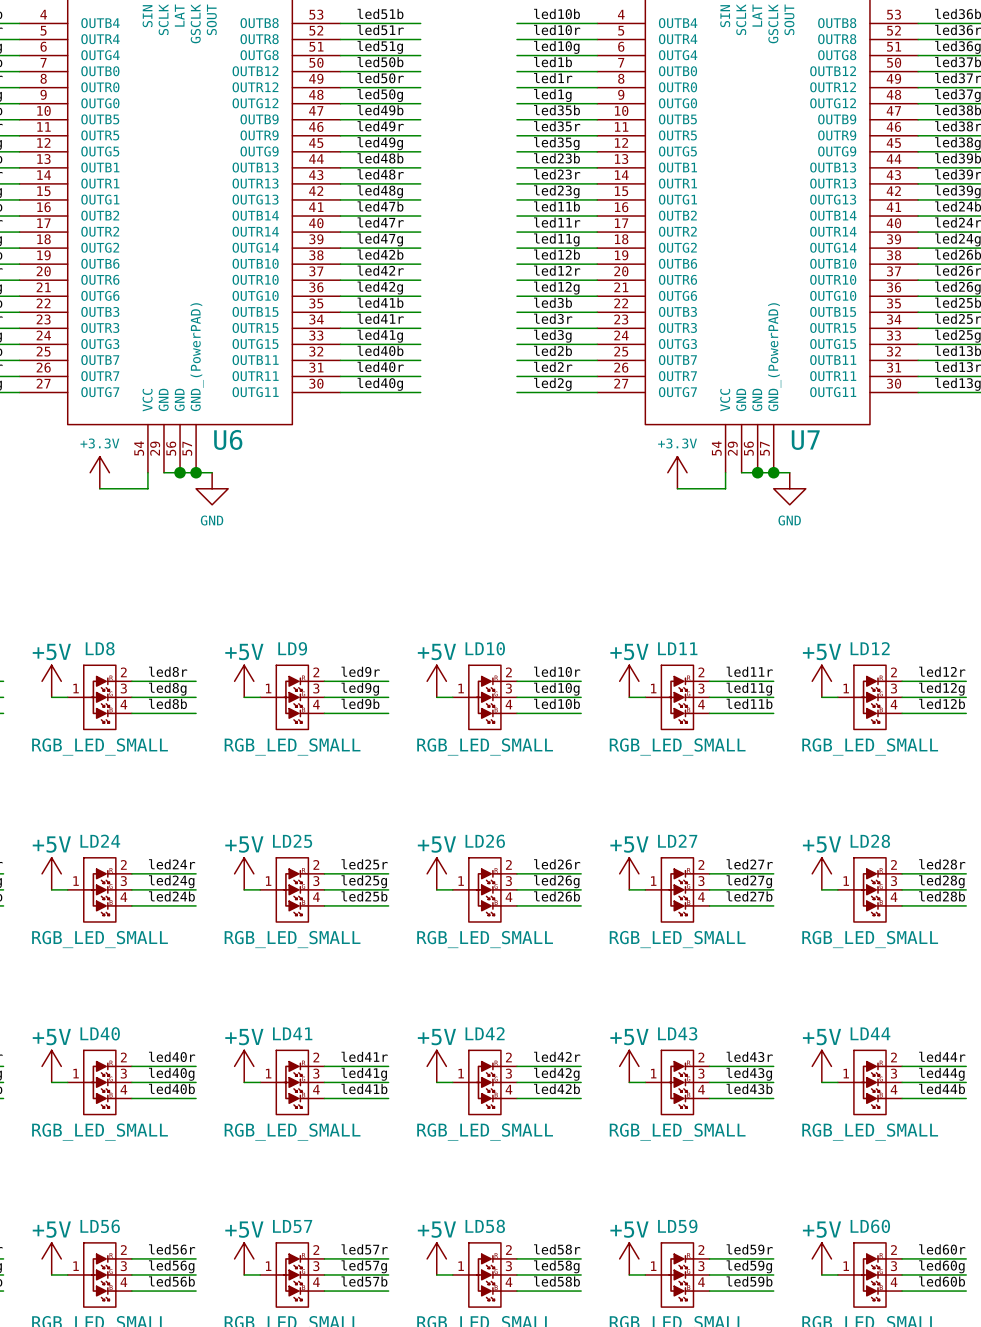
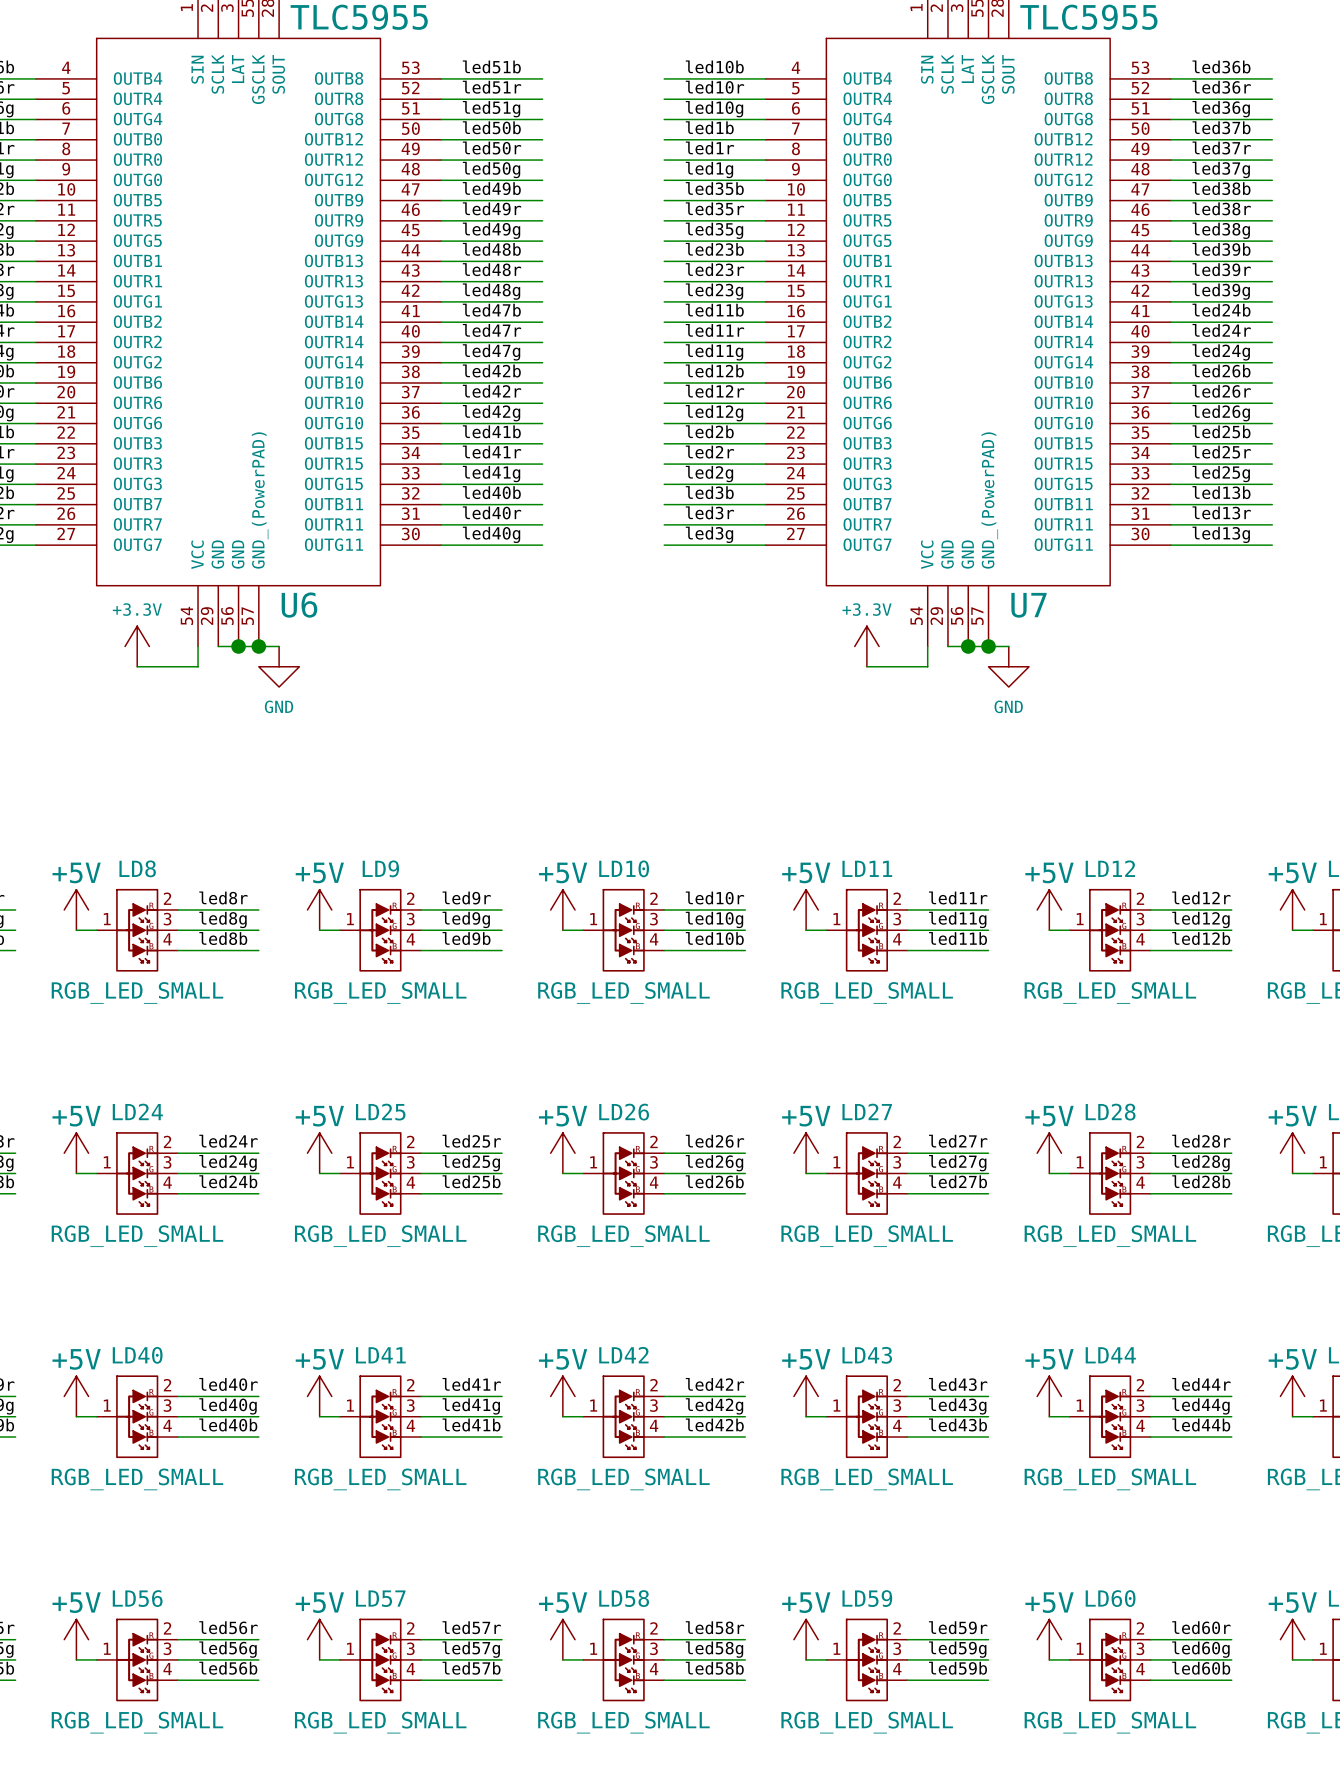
label: led3b (553, 302) -> led2b (709, 431)
label: led3r (553, 318) -> led2r (709, 452)
label: led3g (552, 336) -> led2g (709, 474)
label: led2b (553, 350) -> led3b (709, 492)
label: led2r (553, 366) -> led3r (709, 512)
label: led2g (552, 384) -> led3g (709, 534)

